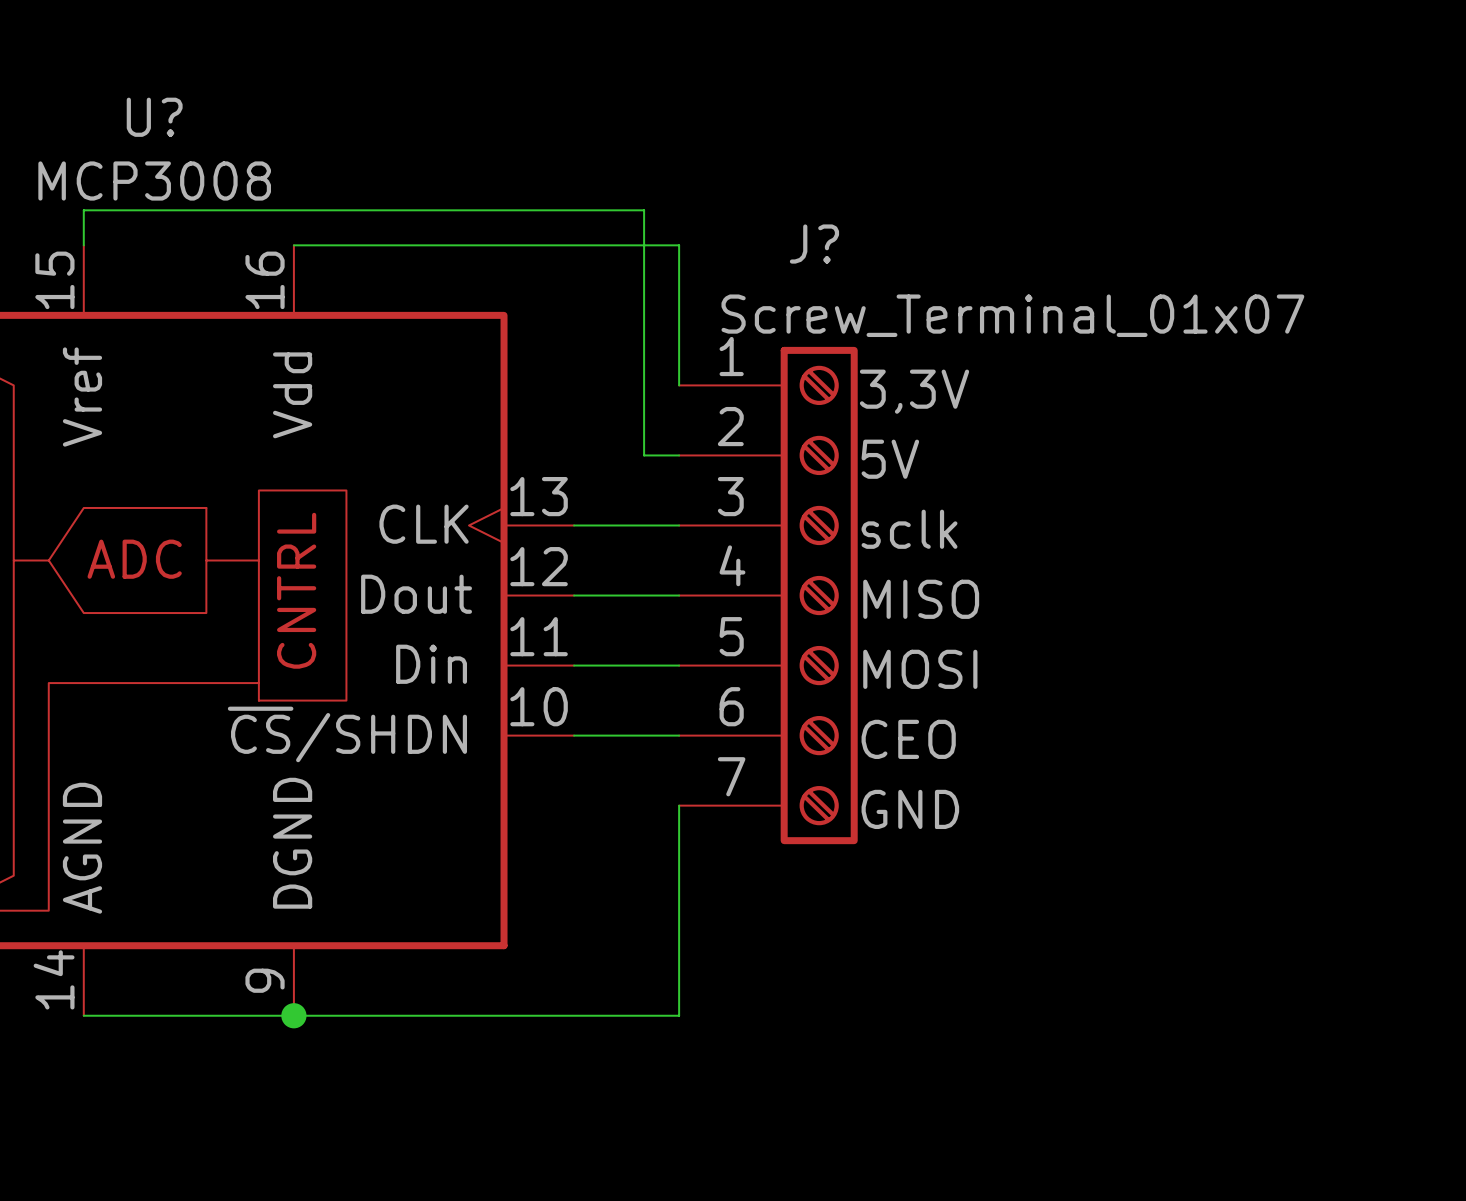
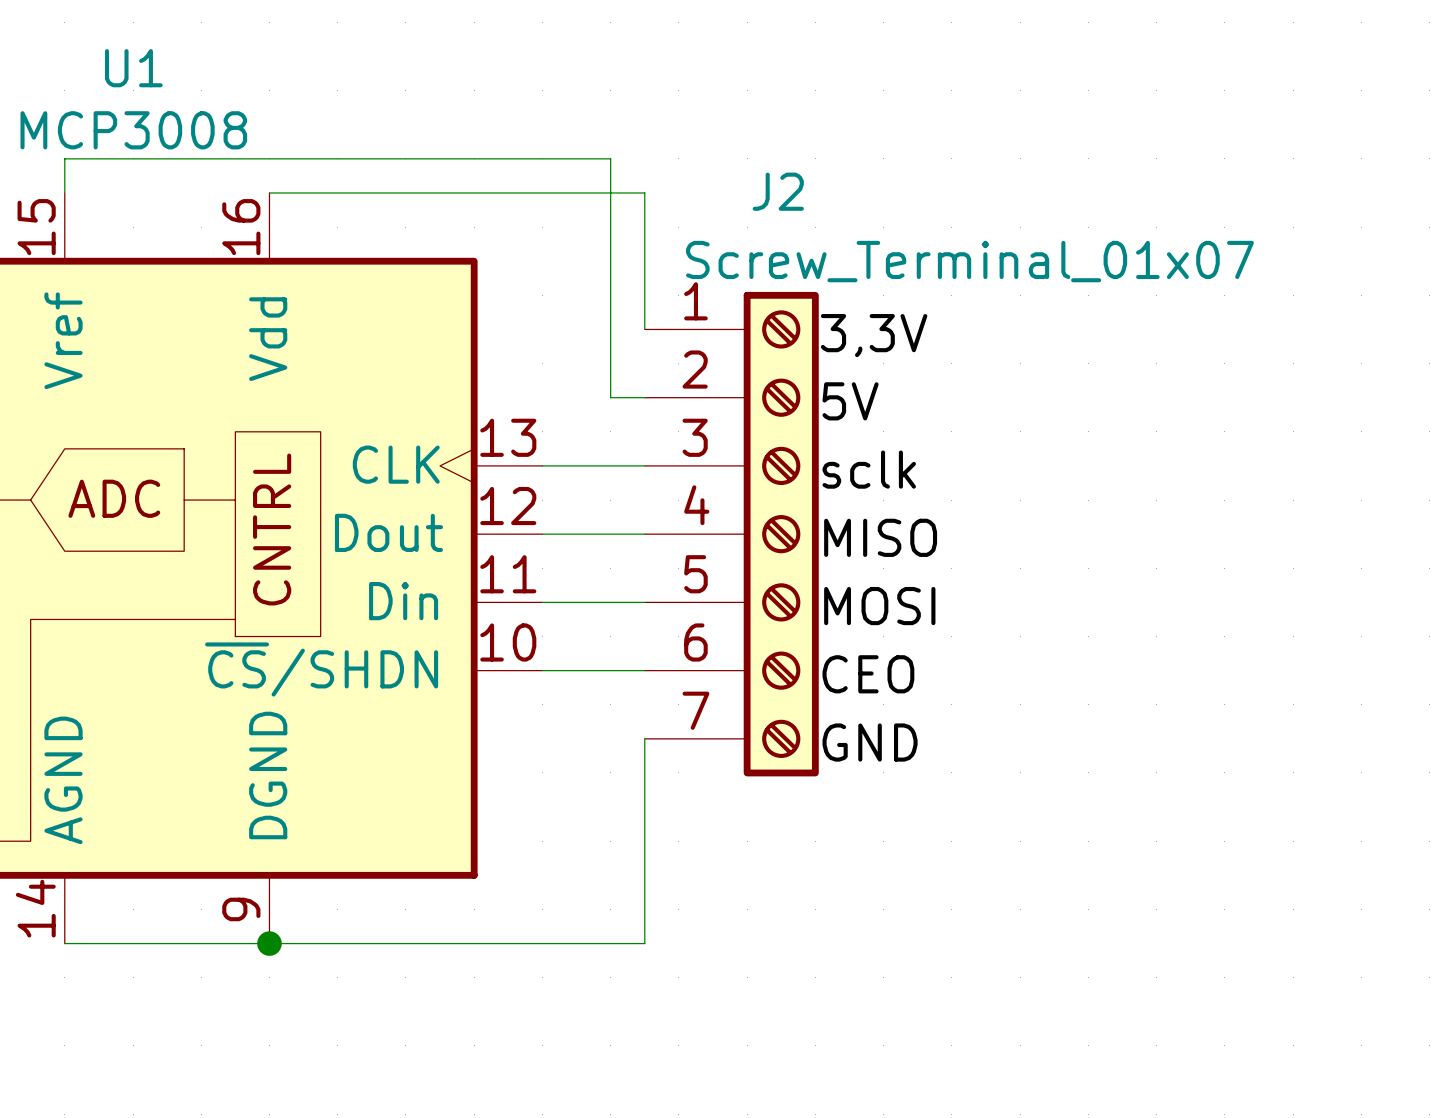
U? name: U? (154, 117) -> U1 (133, 68)
J? name: J? (814, 244) -> J2 (778, 191)

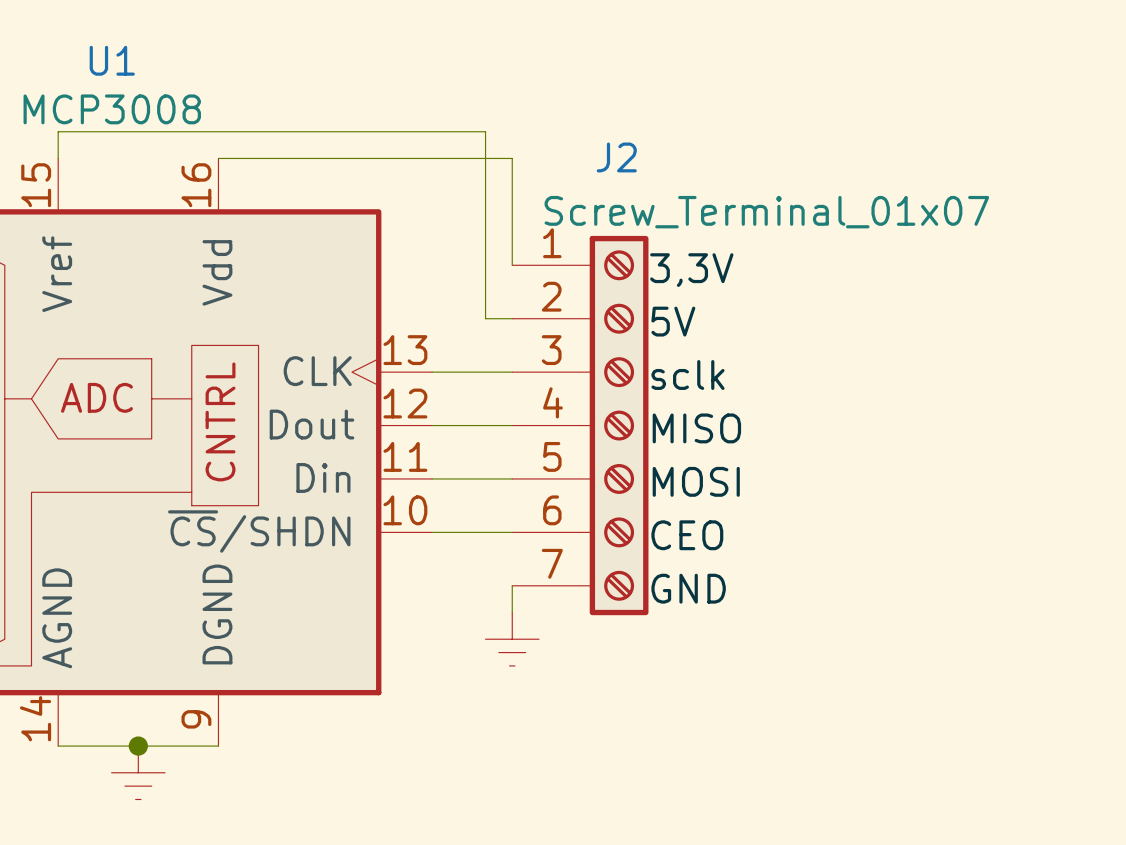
wire: (644, 772) (644, 943) (269, 943) -> none
power symbol: none -> (512, 639)
junction position: (269, 943) -> (138, 746)
power symbol: none -> (138, 772)

